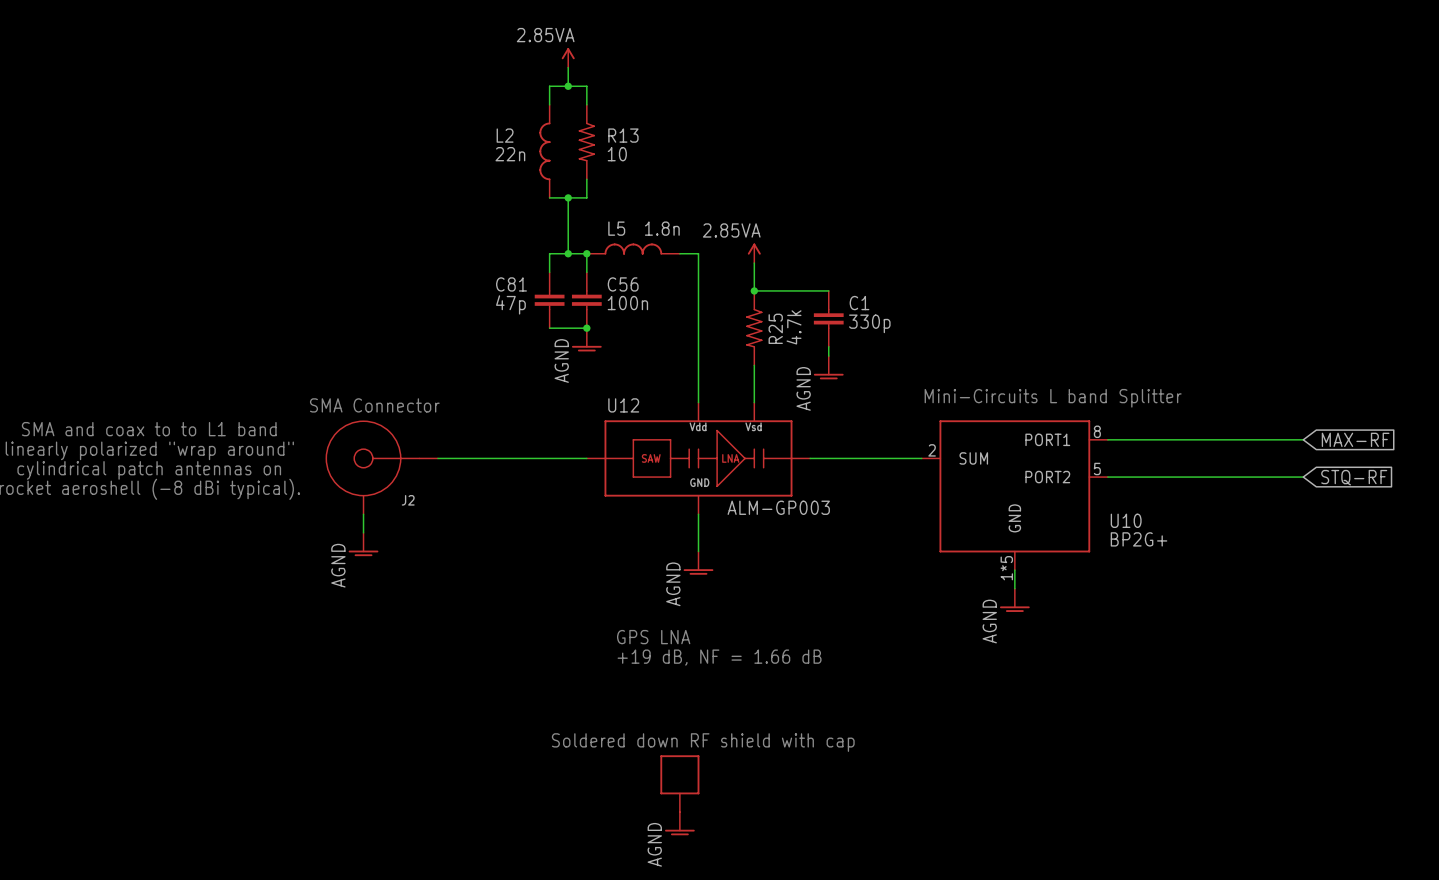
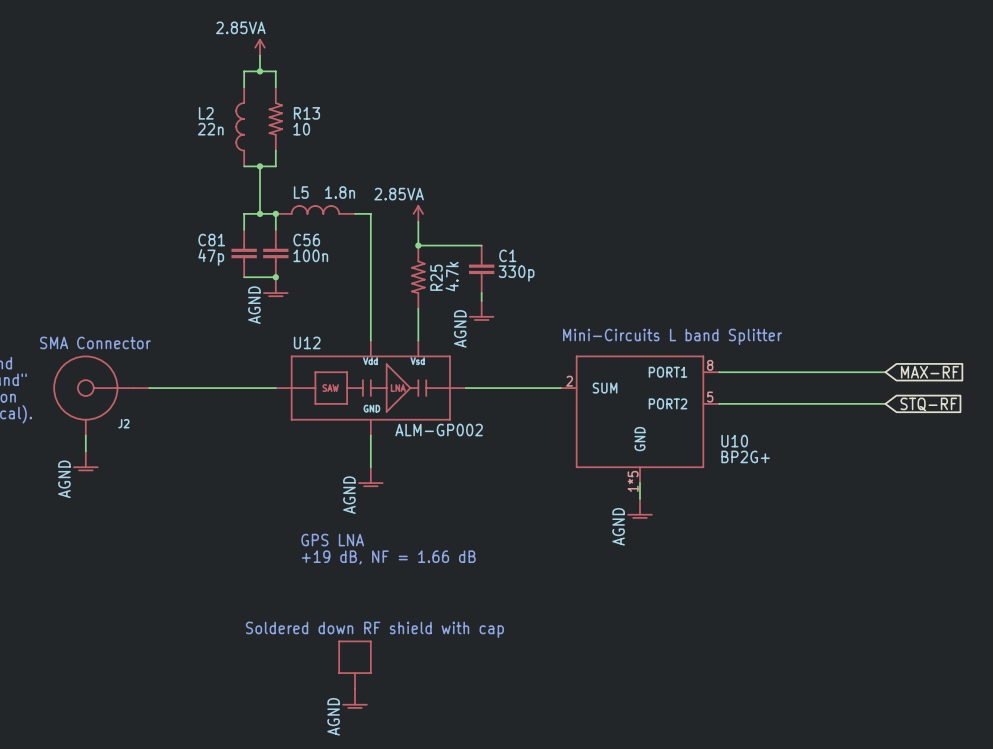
U12 value: ALM-GP003 (778, 507) -> ALM-GP002 (439, 430)

